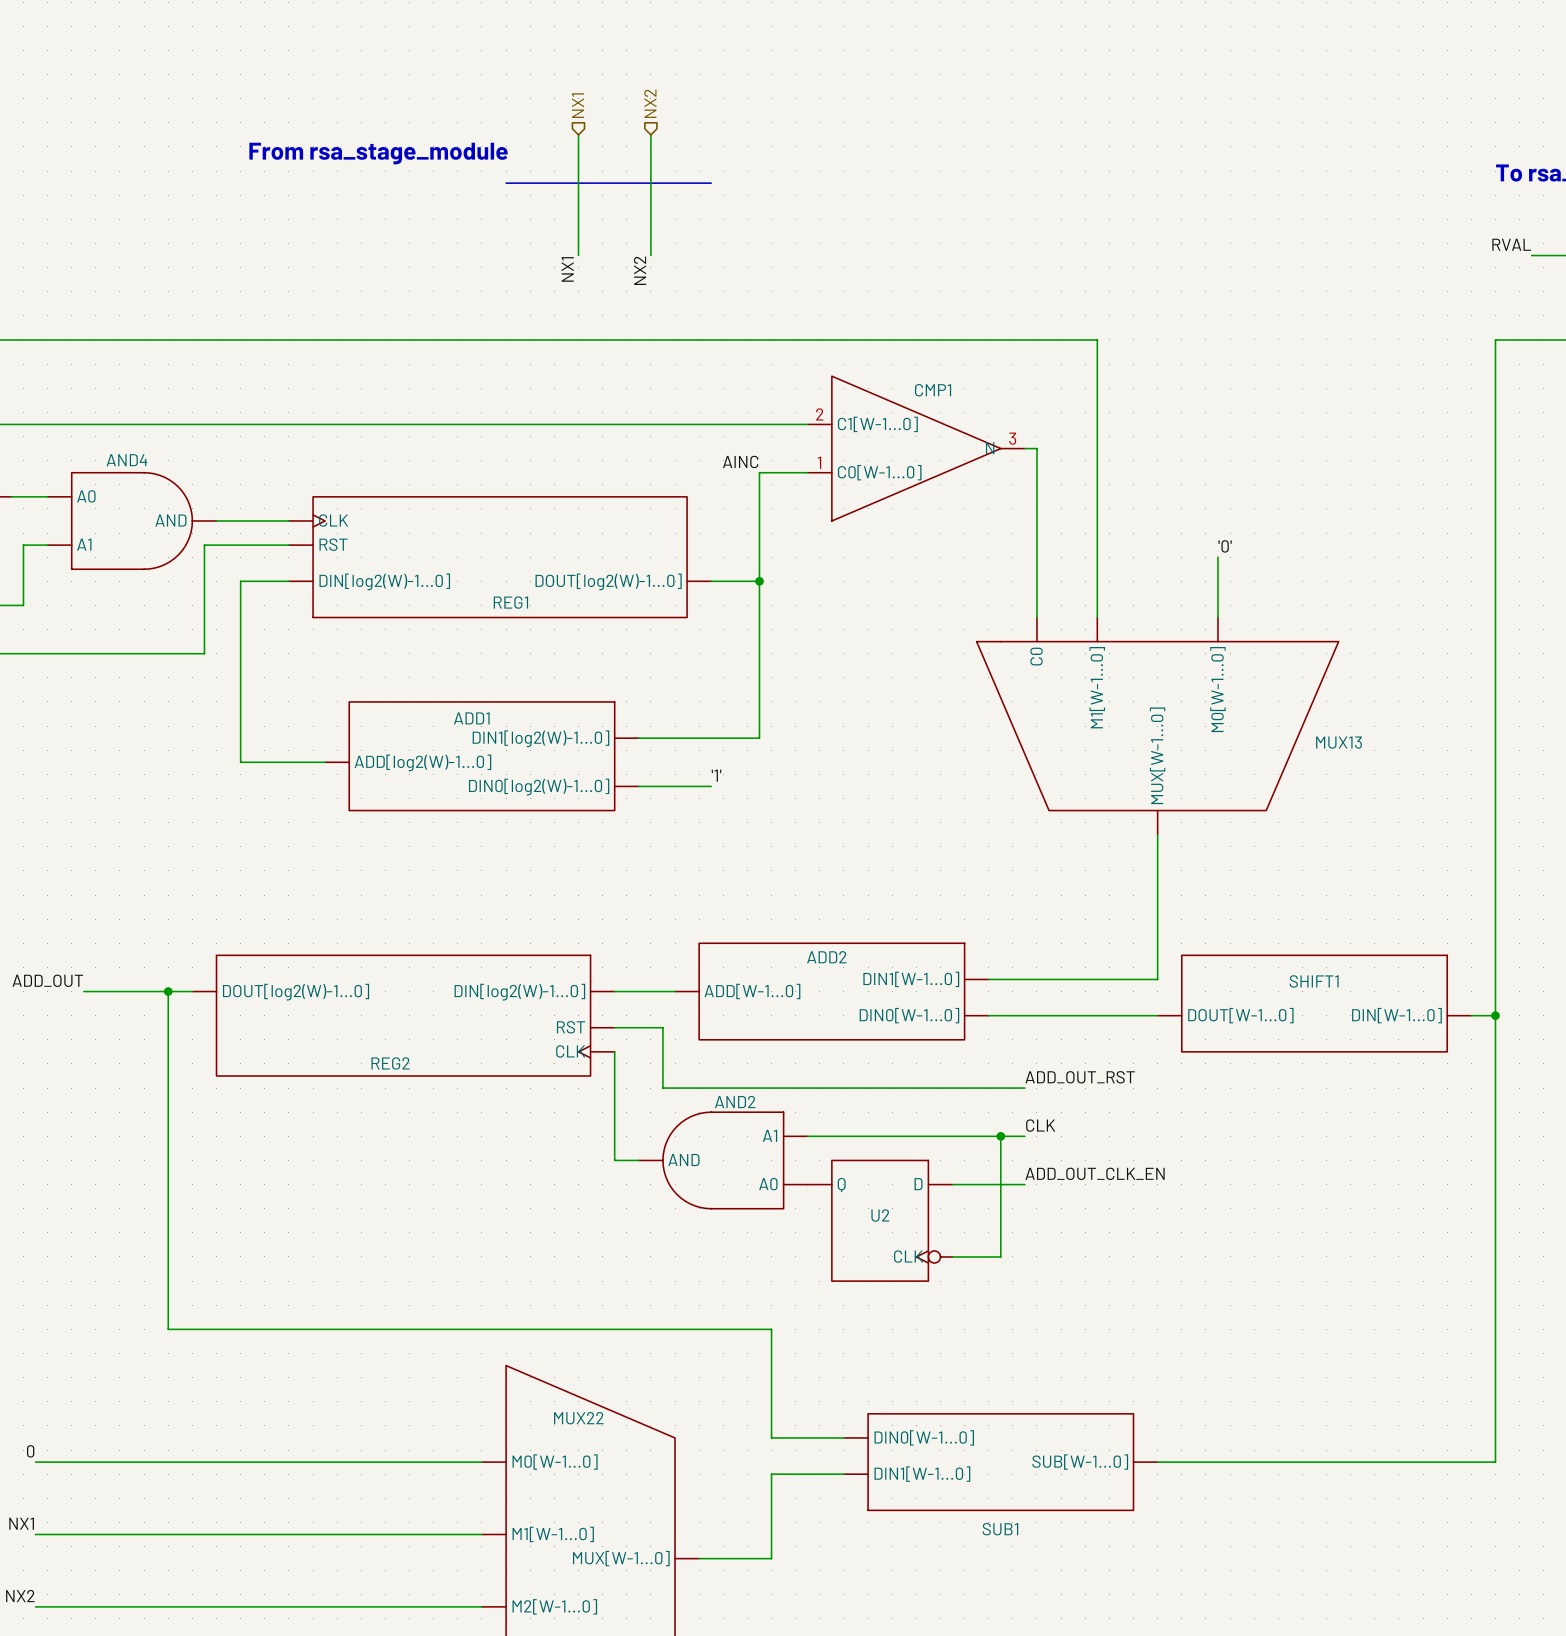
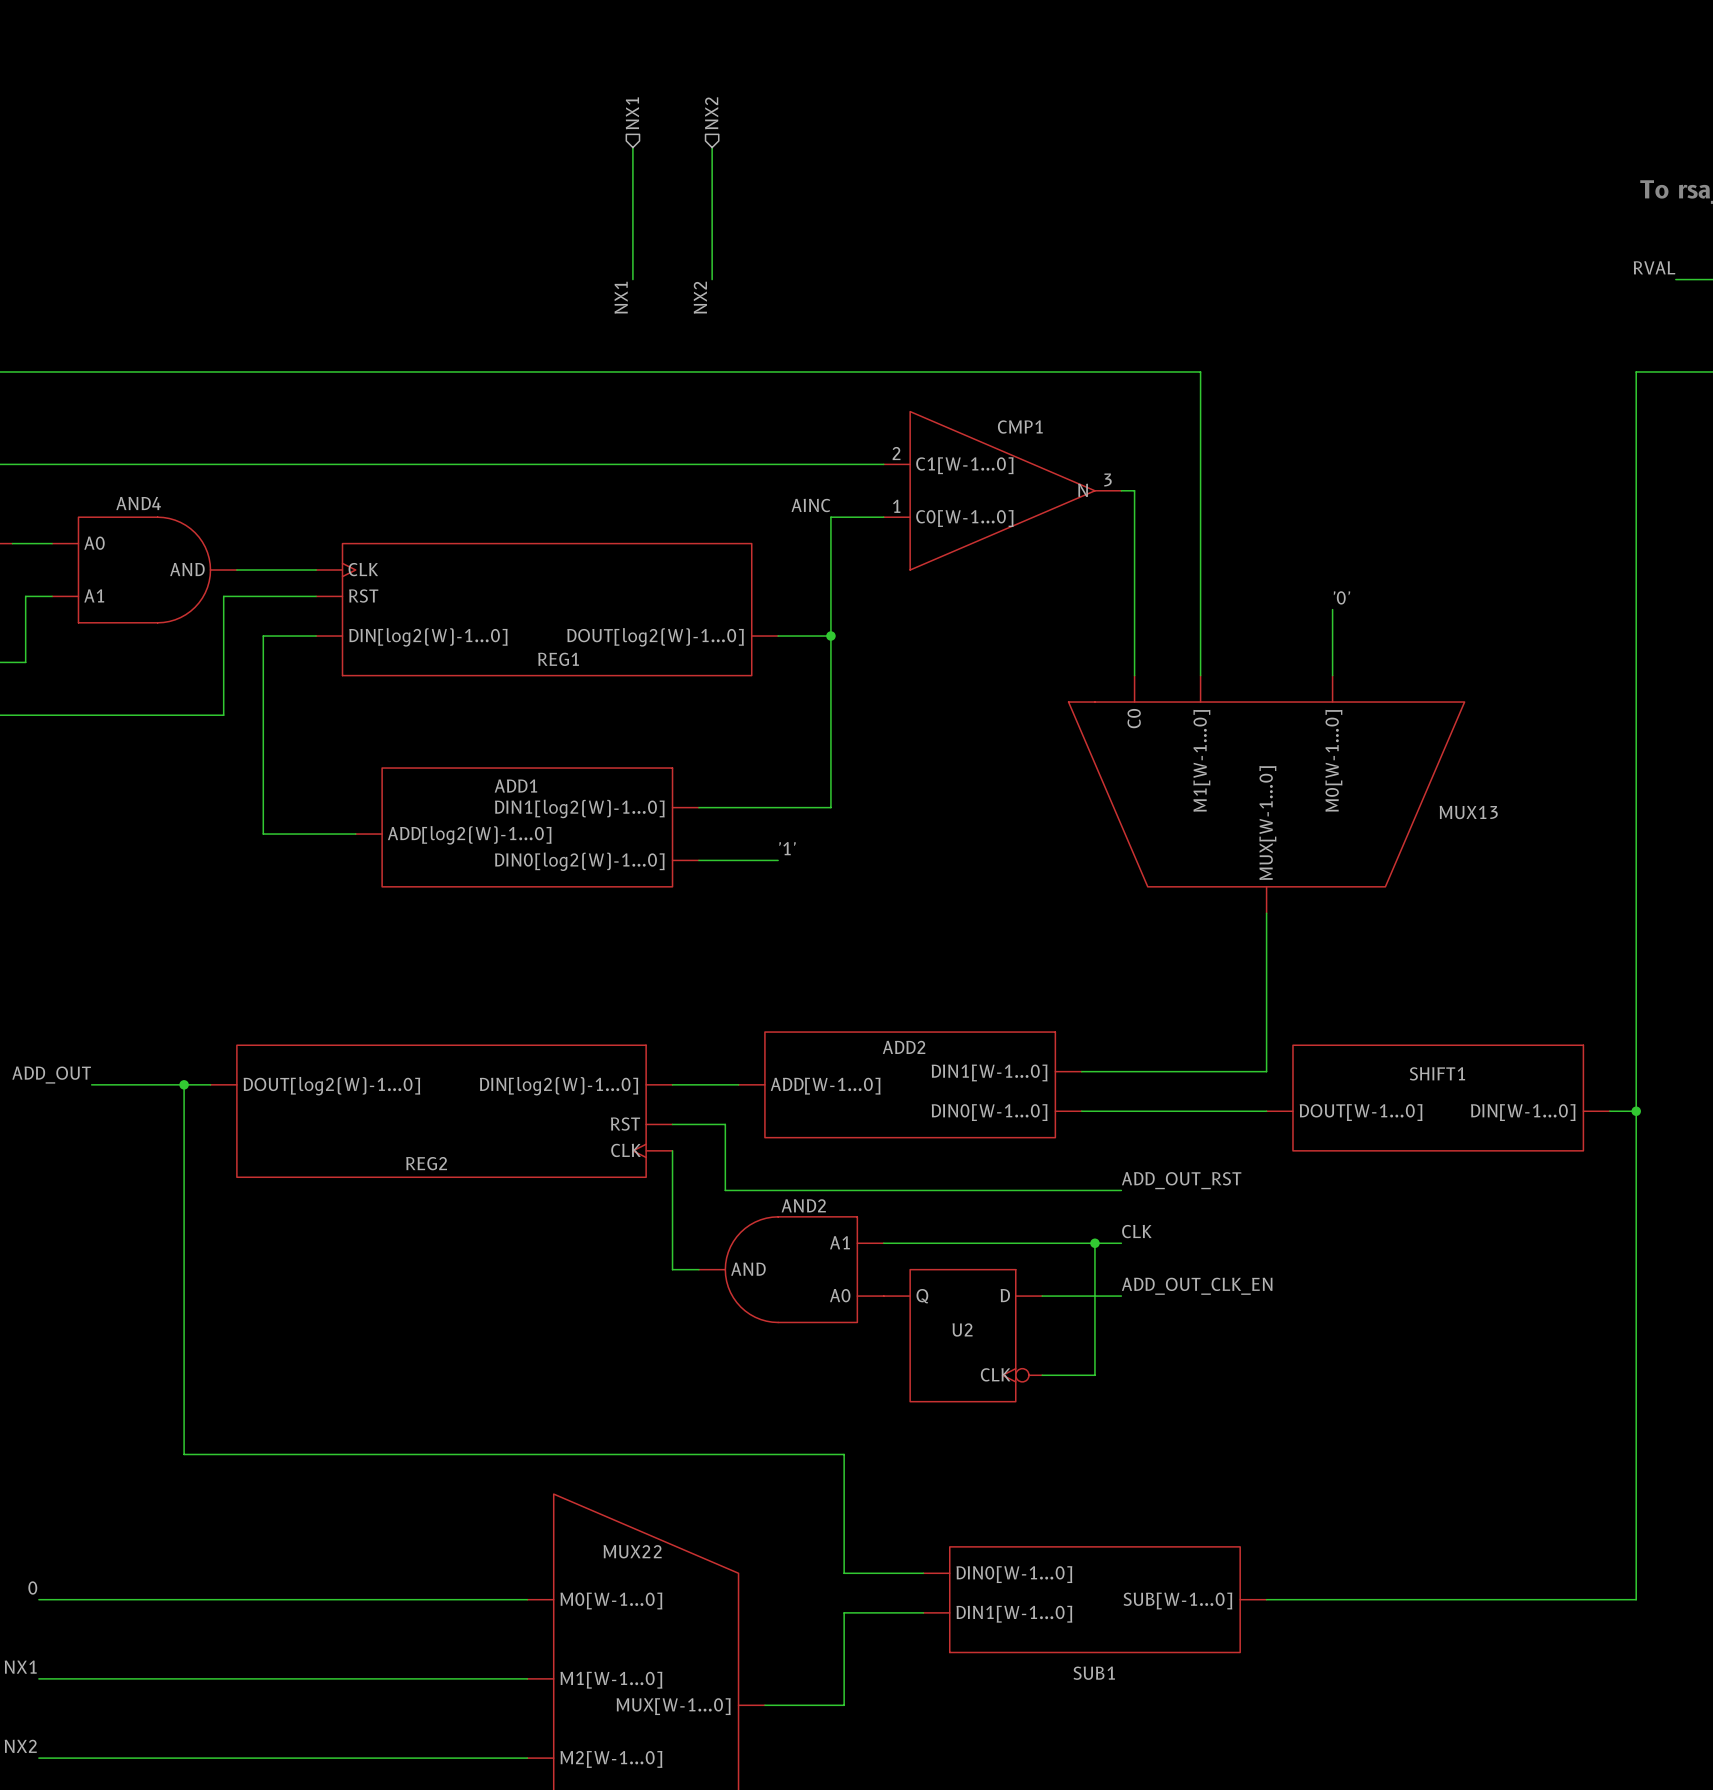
text: From rsa_stage_module (378, 153) -> none
line: (506, 183) (711, 183) -> none

